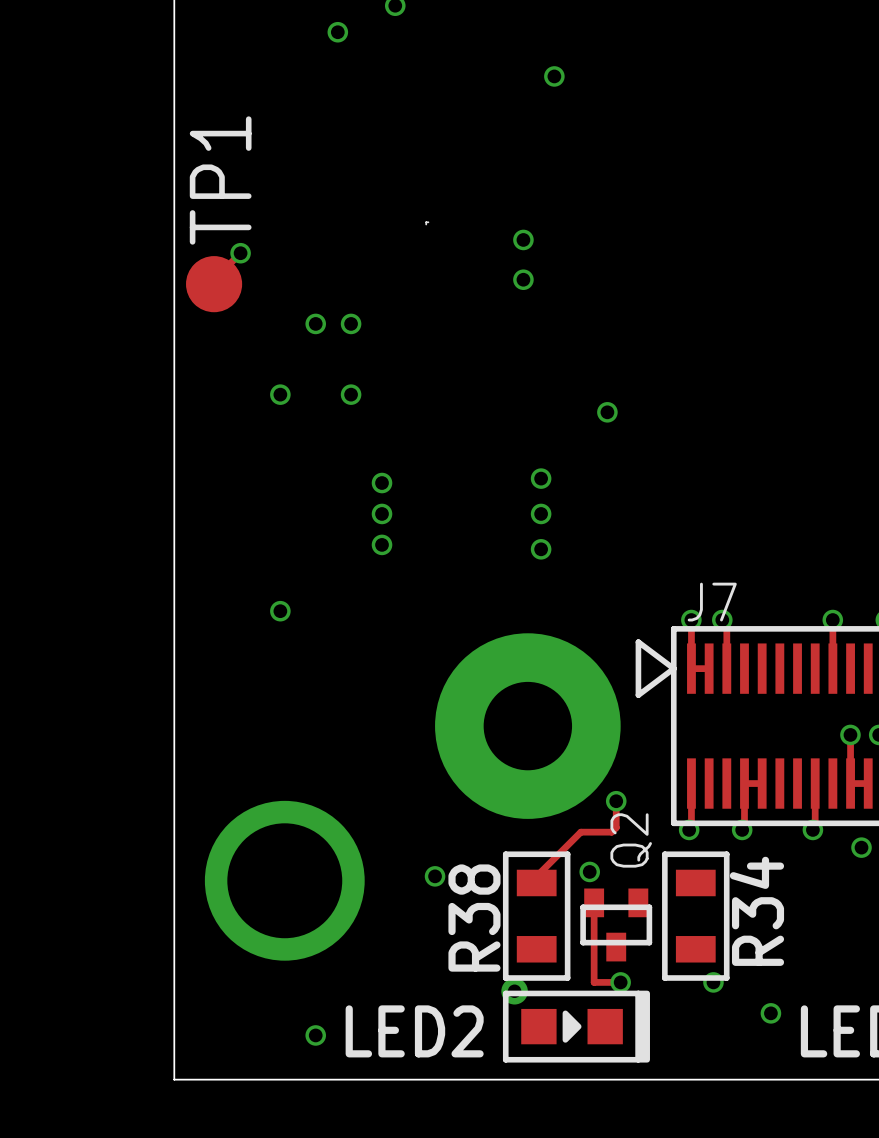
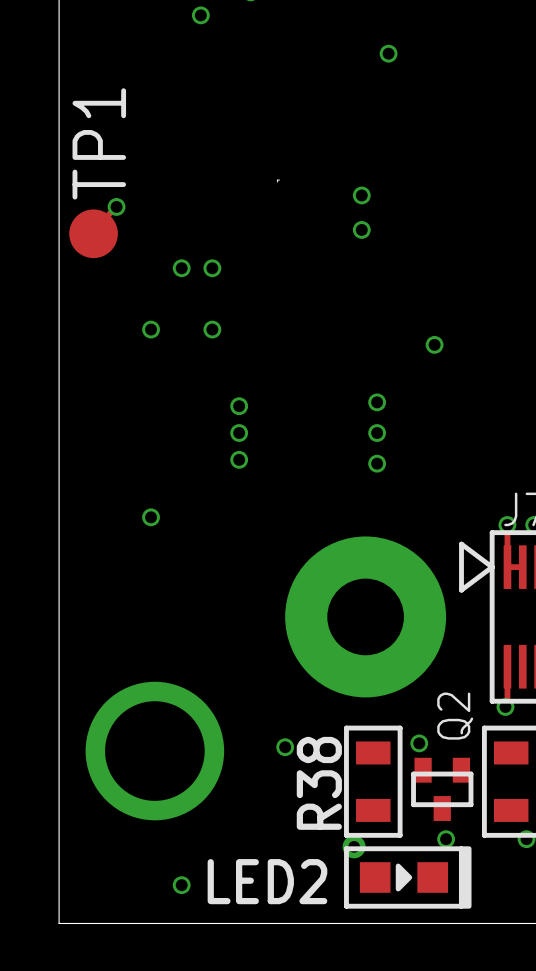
track: (616, 801) (616, 827) (611, 832) (580, 832) (536, 876) (536, 882) -> none
via: (616, 801) -> none
track: (594, 902) (594, 982) (620, 982) -> none

